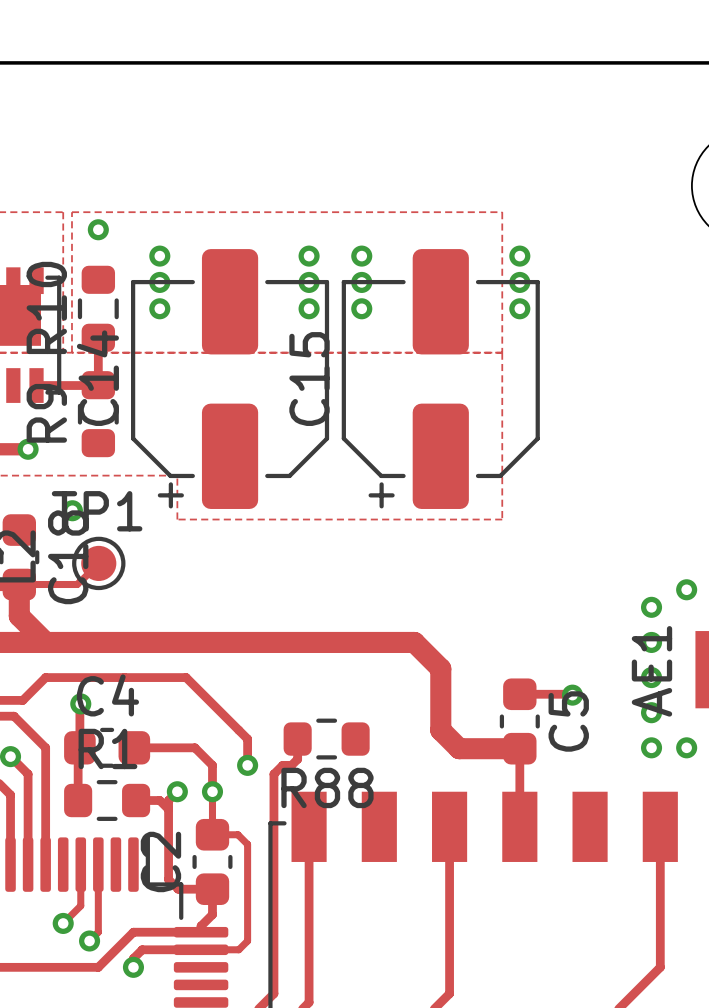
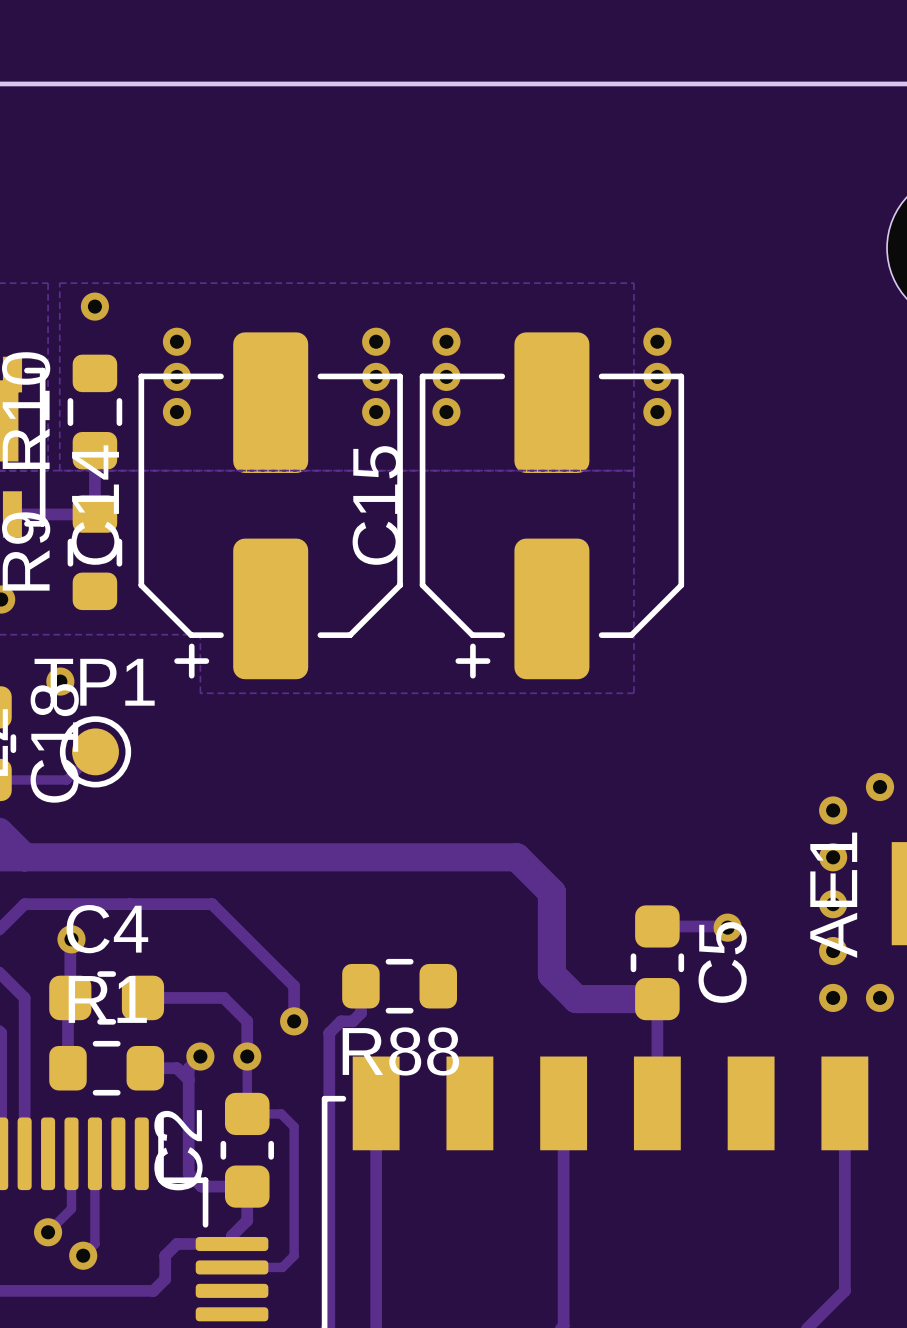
track: (159, 932) (133, 932) (98, 967) -> (176, 1244) (165, 1255) (165, 1279) (153, 1290) (94, 1290)
track: (201, 949) (142, 949) (133, 958) (133, 967) -> none
via: (133, 967) -> none

